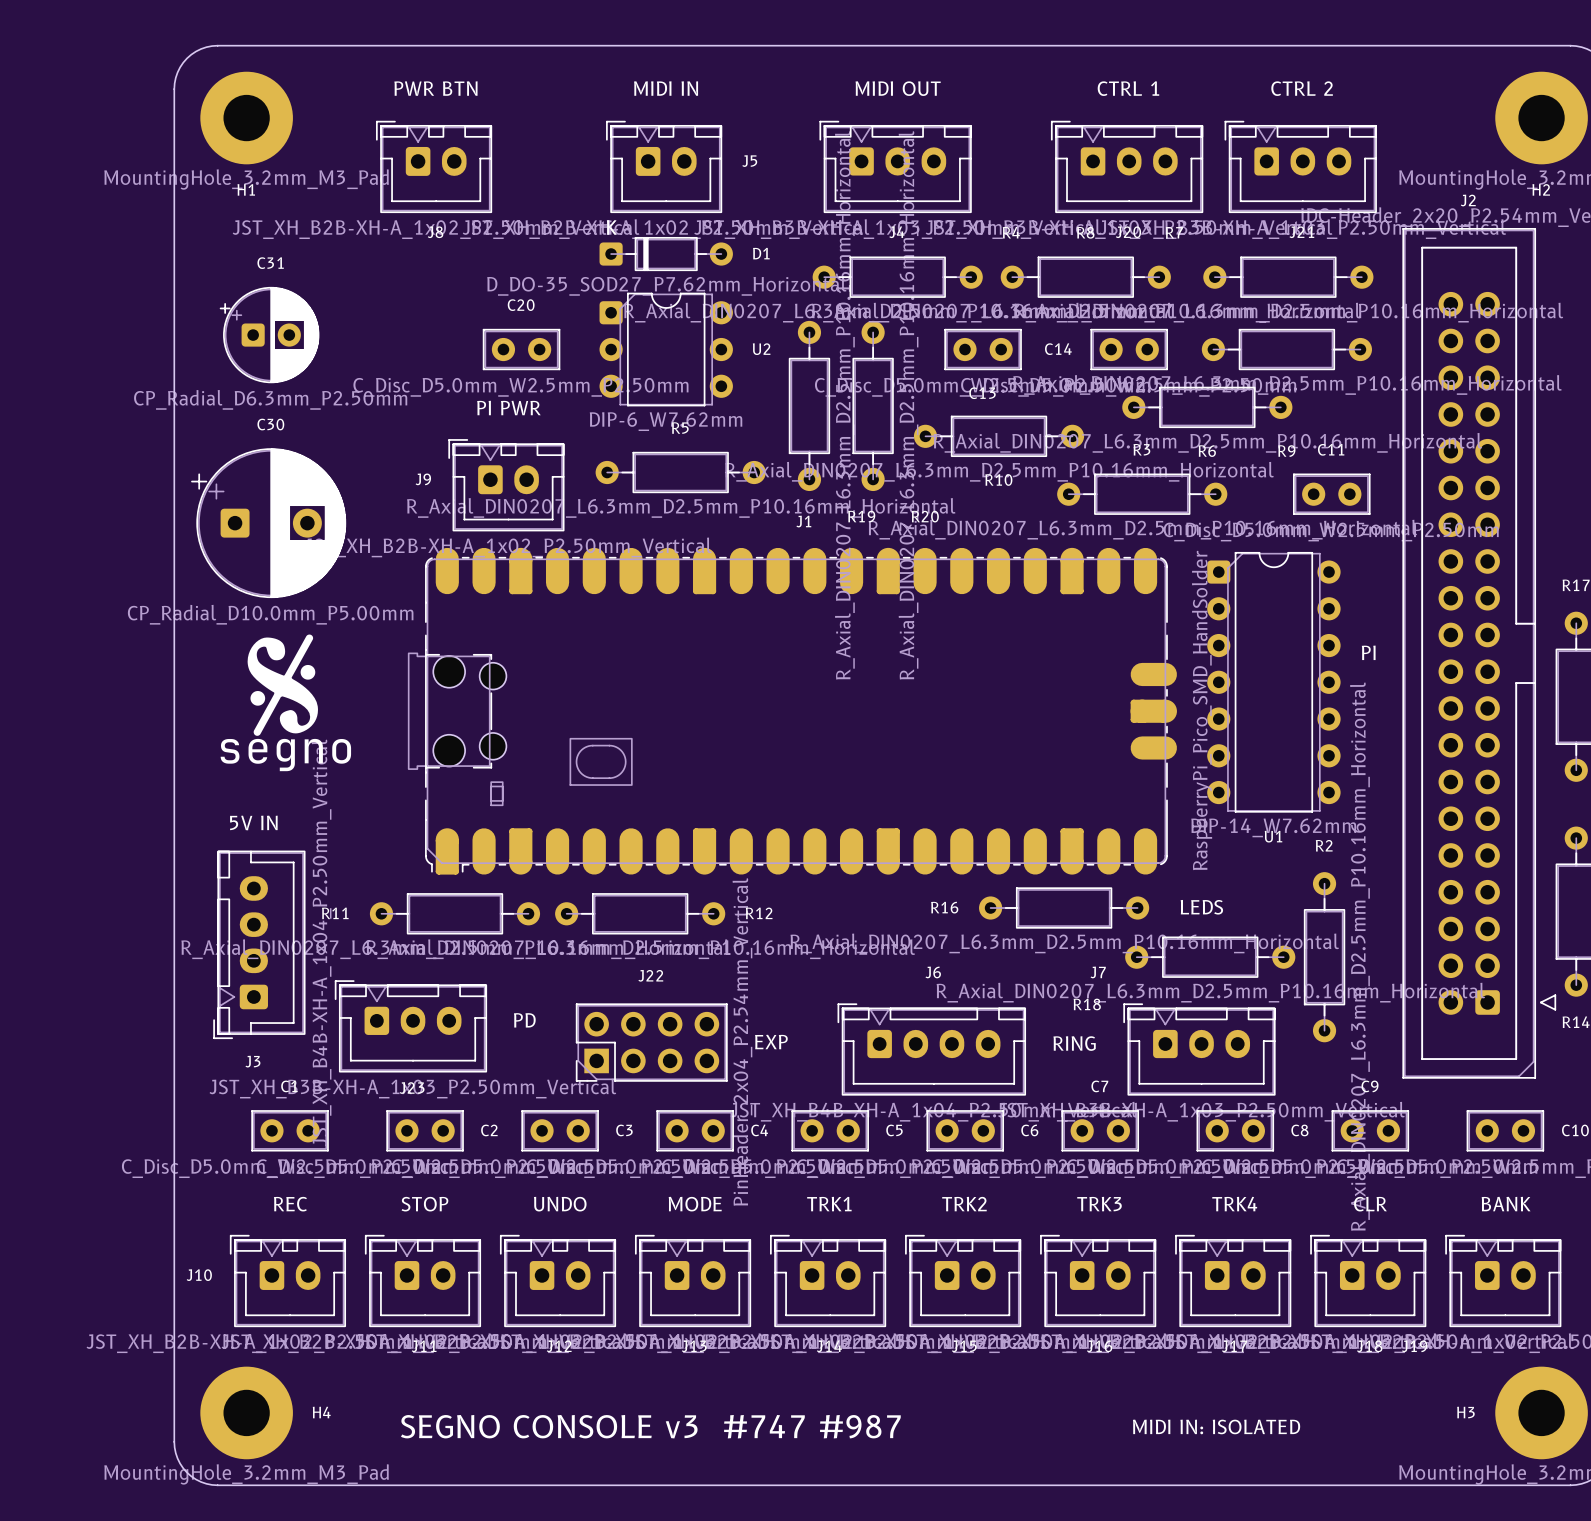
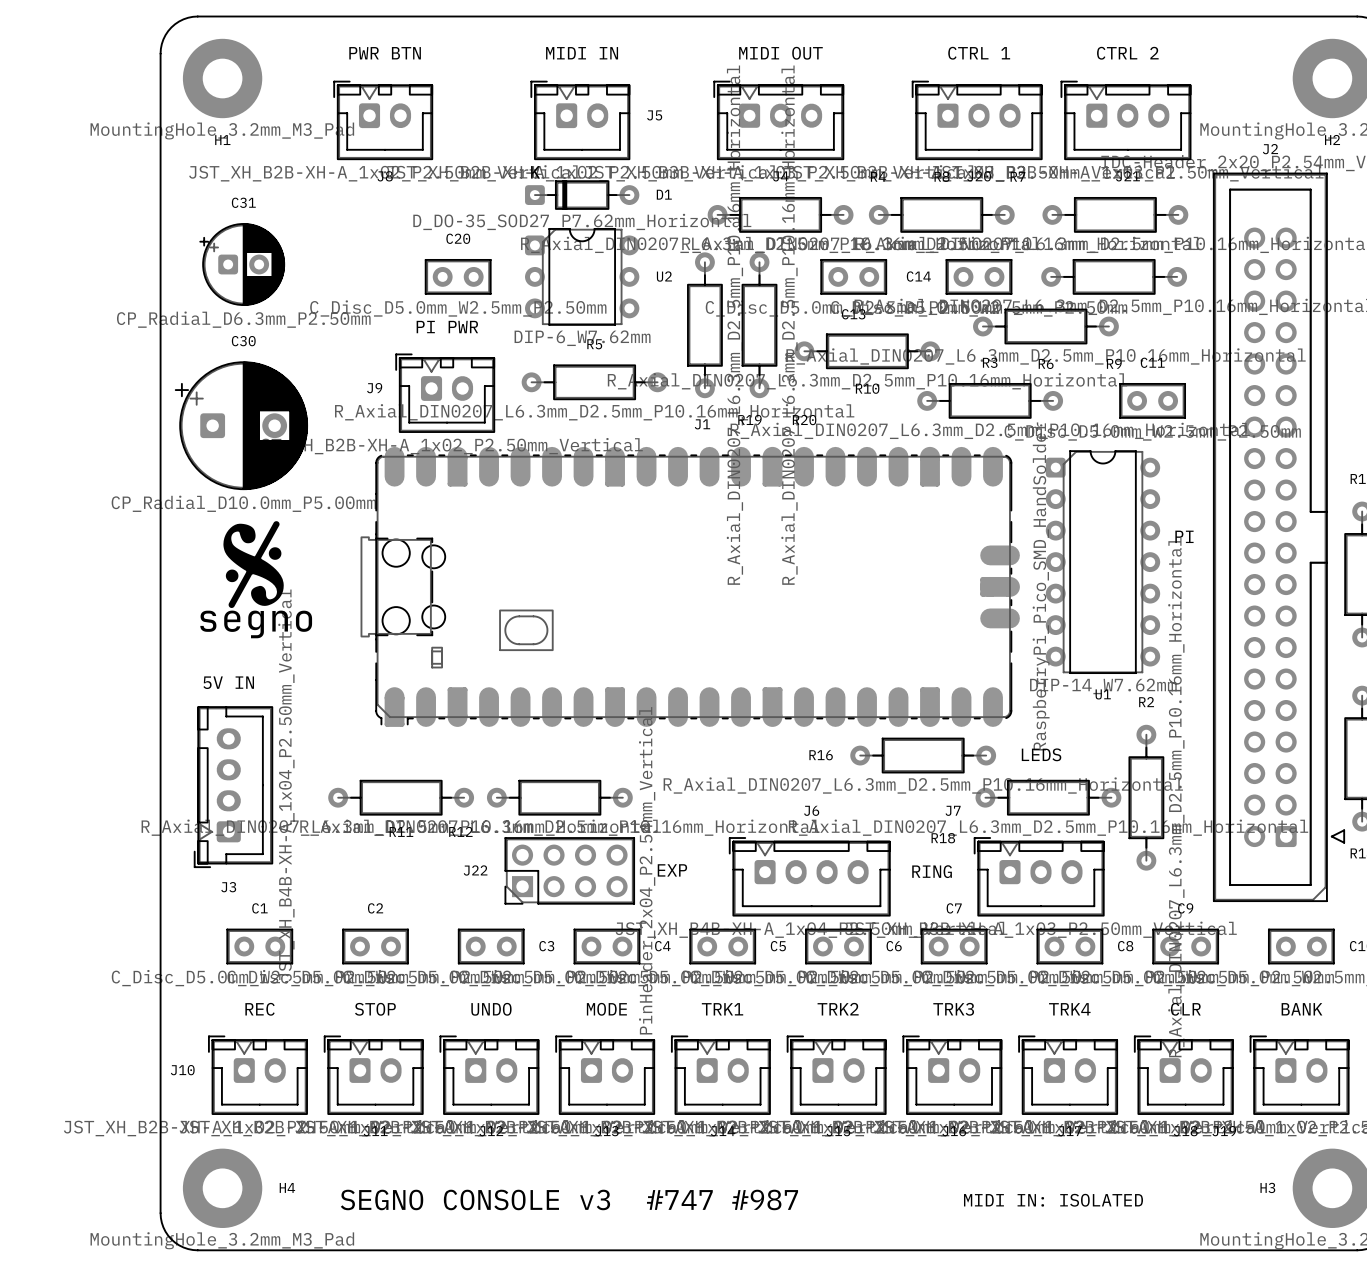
R11 name position: R11 (335, 913) -> R11 (401, 831)
R11 position: (454, 913) -> (401, 797)
R12 position: (640, 913) -> (559, 797)
R12 name position: R12 (759, 913) -> R12 (460, 831)
J22 name position: J22 (650, 975) -> J22 (475, 870)
text: PD (524, 1020) -> none
J23: JST_XH_B3B-XH-A_1x03_P2.50mm_Vertical (410, 1026) -> none
C2 name position: C2 (489, 1130) -> C2 (375, 908)

